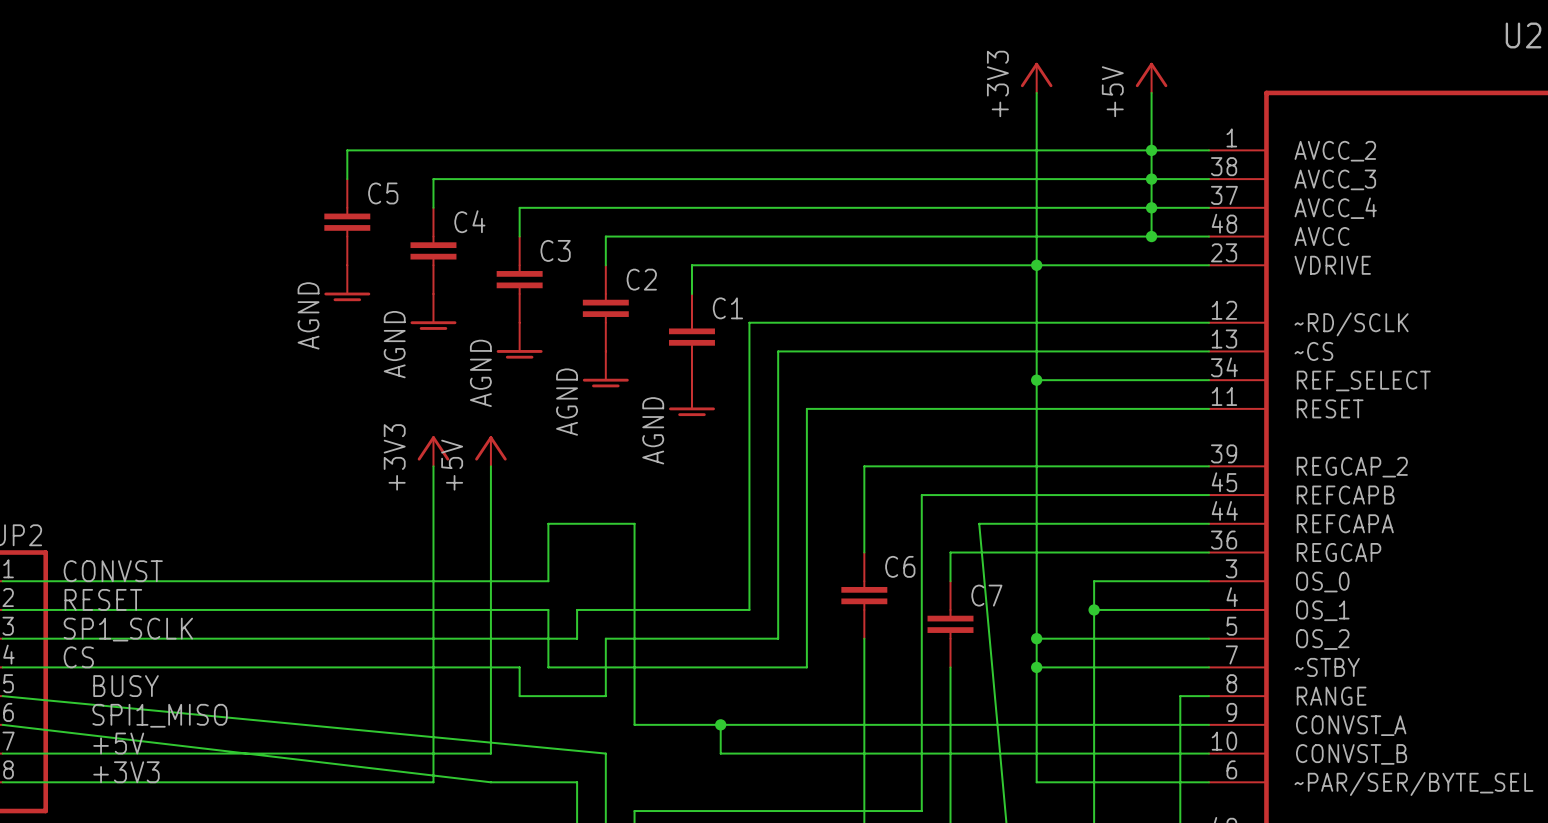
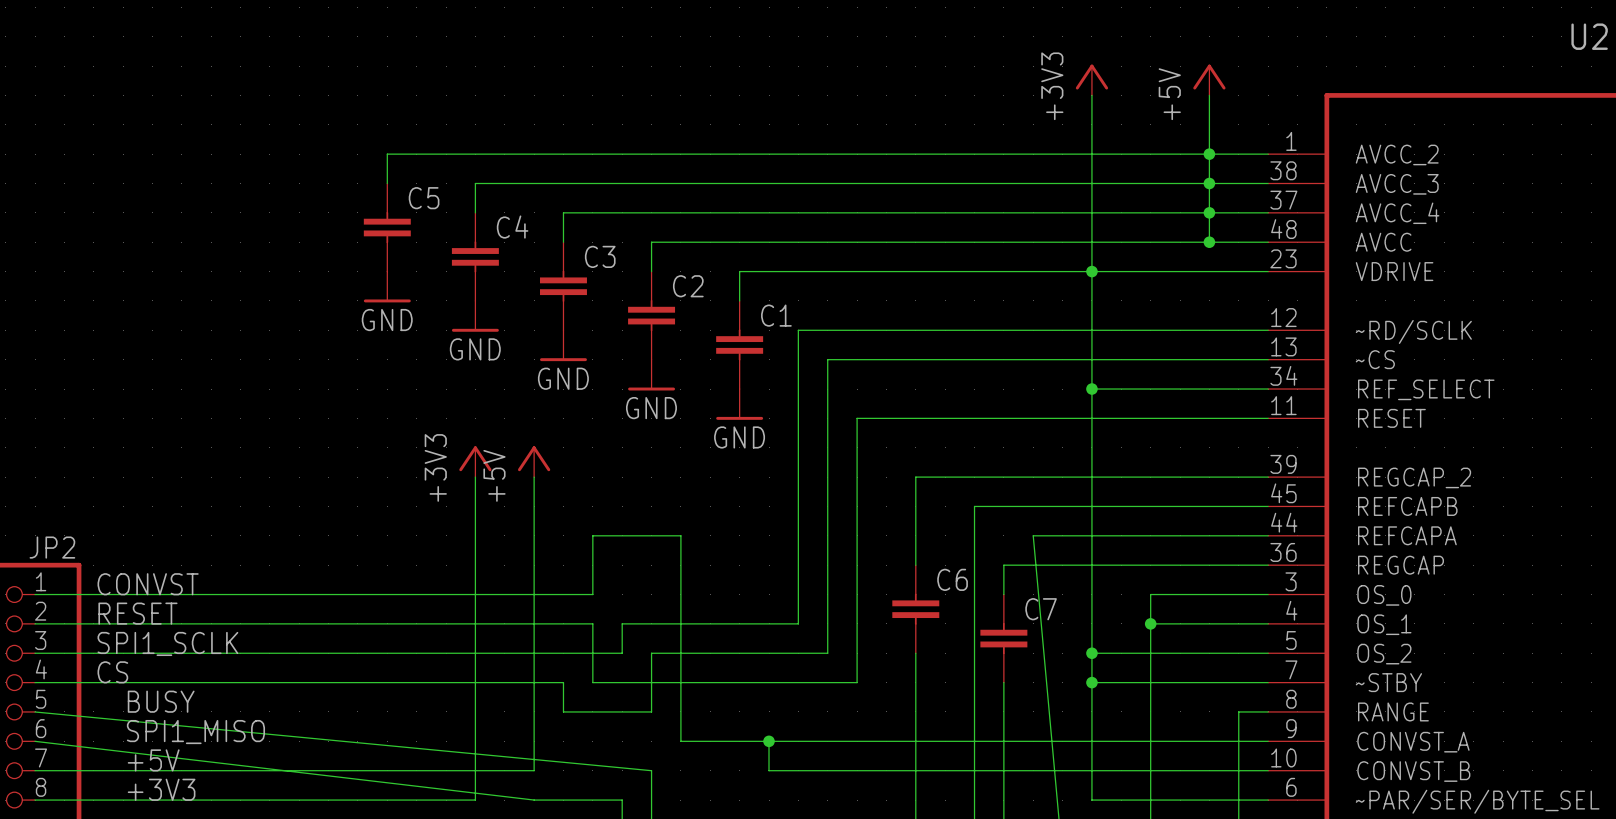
power symbol: AGND (347, 283) -> GND (387, 286)
power symbol: AGND (433, 311) -> GND (475, 316)
power symbol: AGND (519, 340) -> GND (563, 345)
power symbol: AGND (605, 369) -> GND (651, 375)
power symbol: AGND (691, 398) -> GND (739, 404)
label: SP1_SCLK (128, 629) -> SPI1_SCLK (167, 643)

